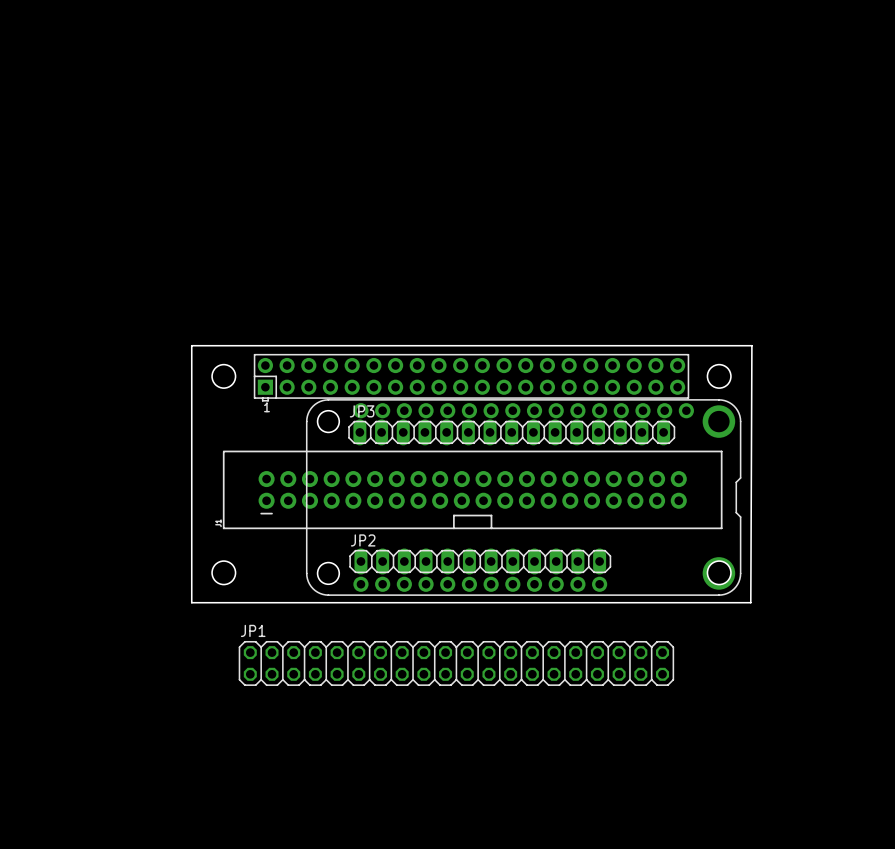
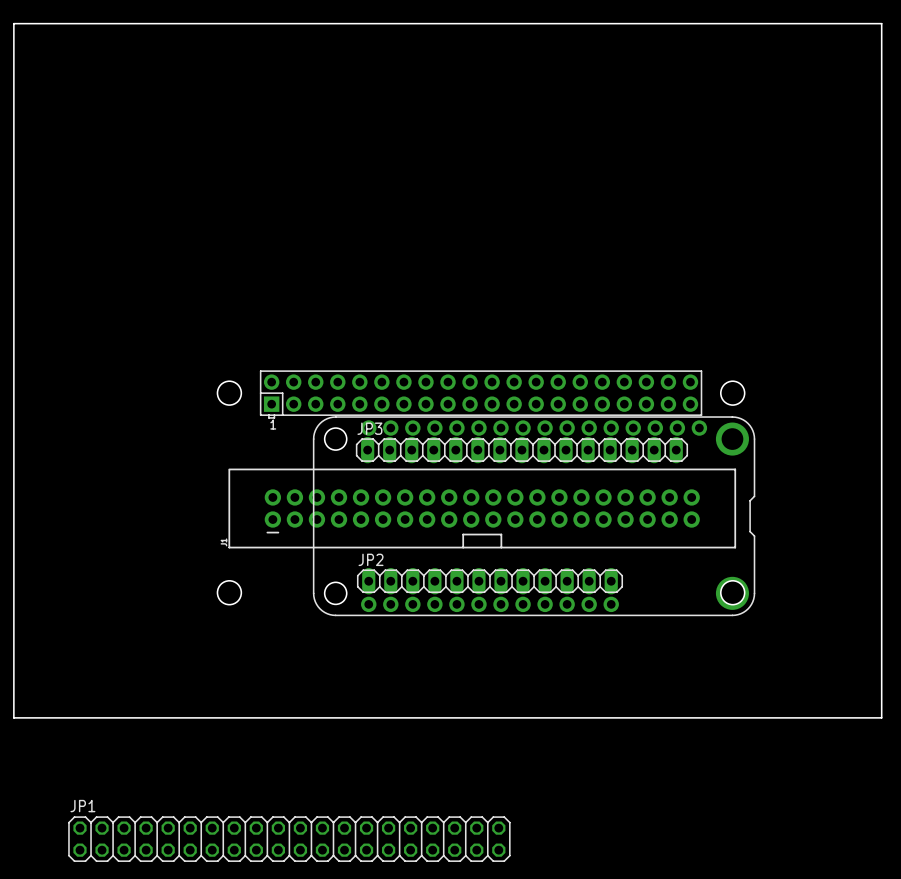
board edge: none -> (13, 23) (881, 23) (881, 717) (13, 717) (13, 23)
board edge: (191, 345) (751, 345) (750, 602) (191, 602) (191, 345) -> none
JP1 position: (456, 663) -> (289, 839)

